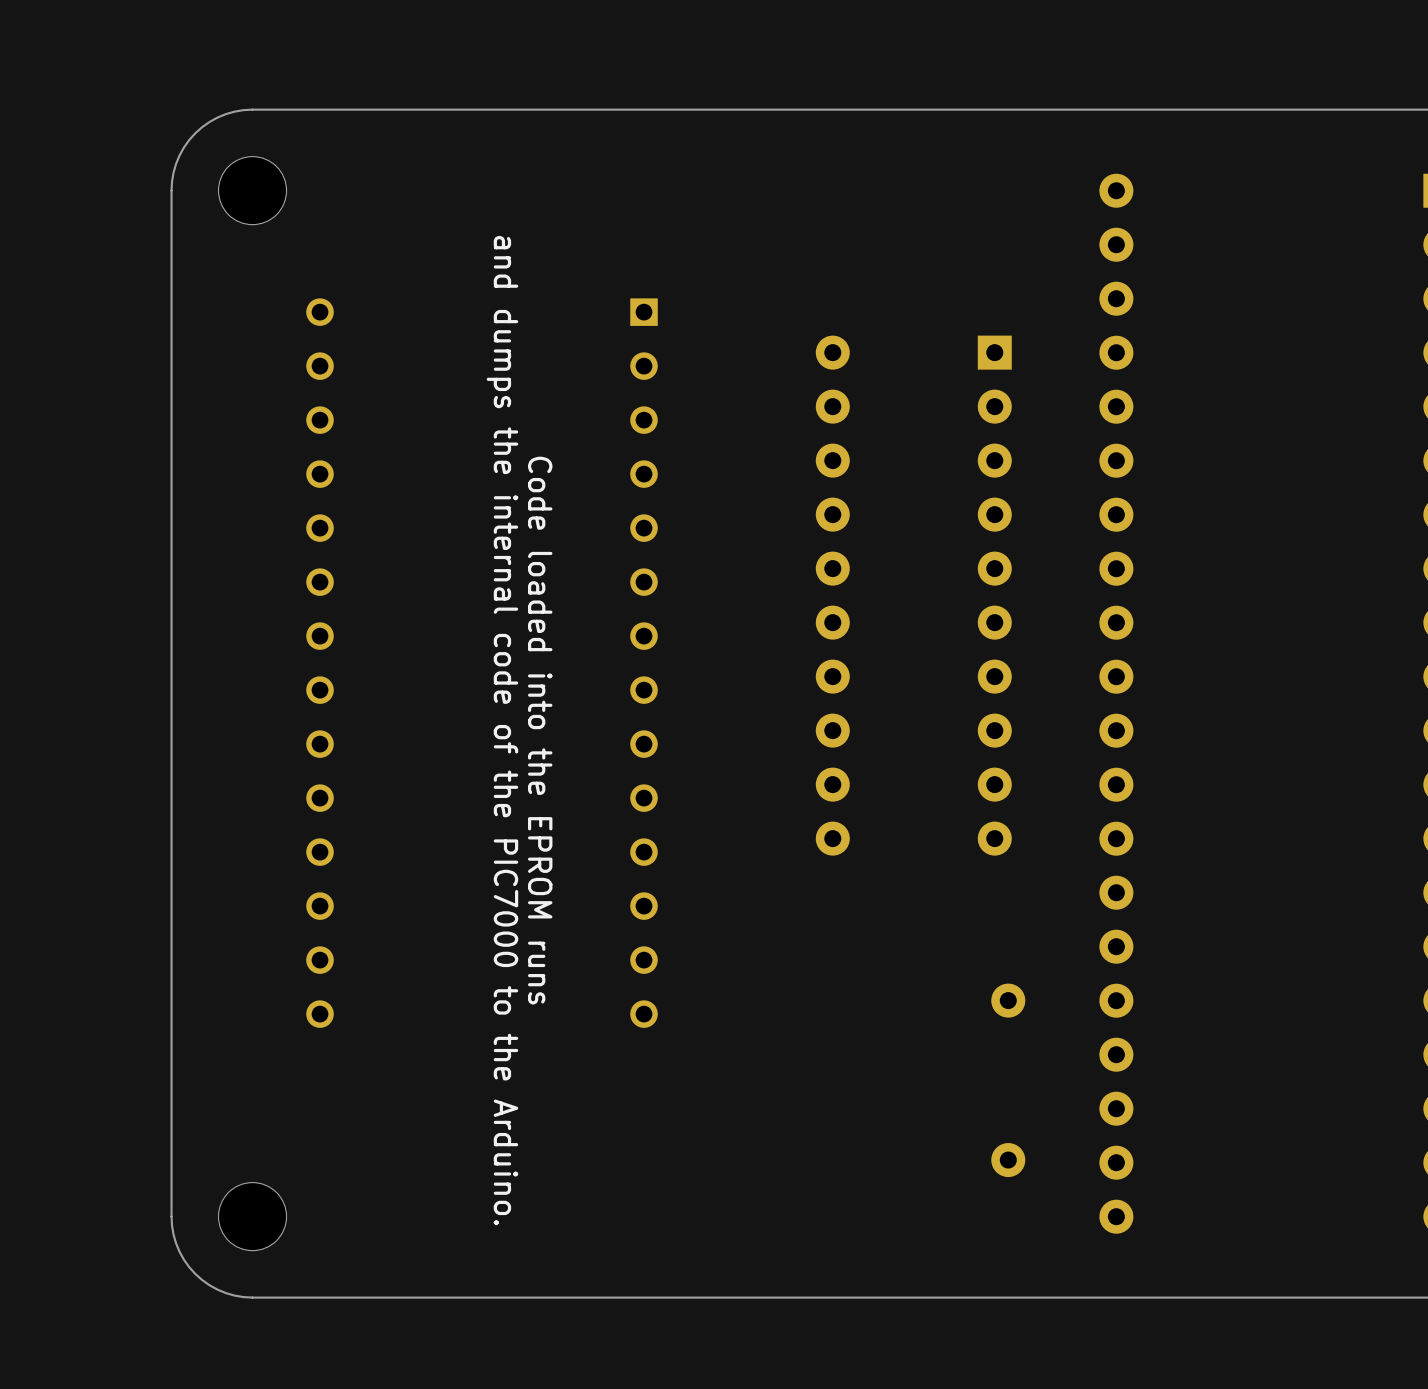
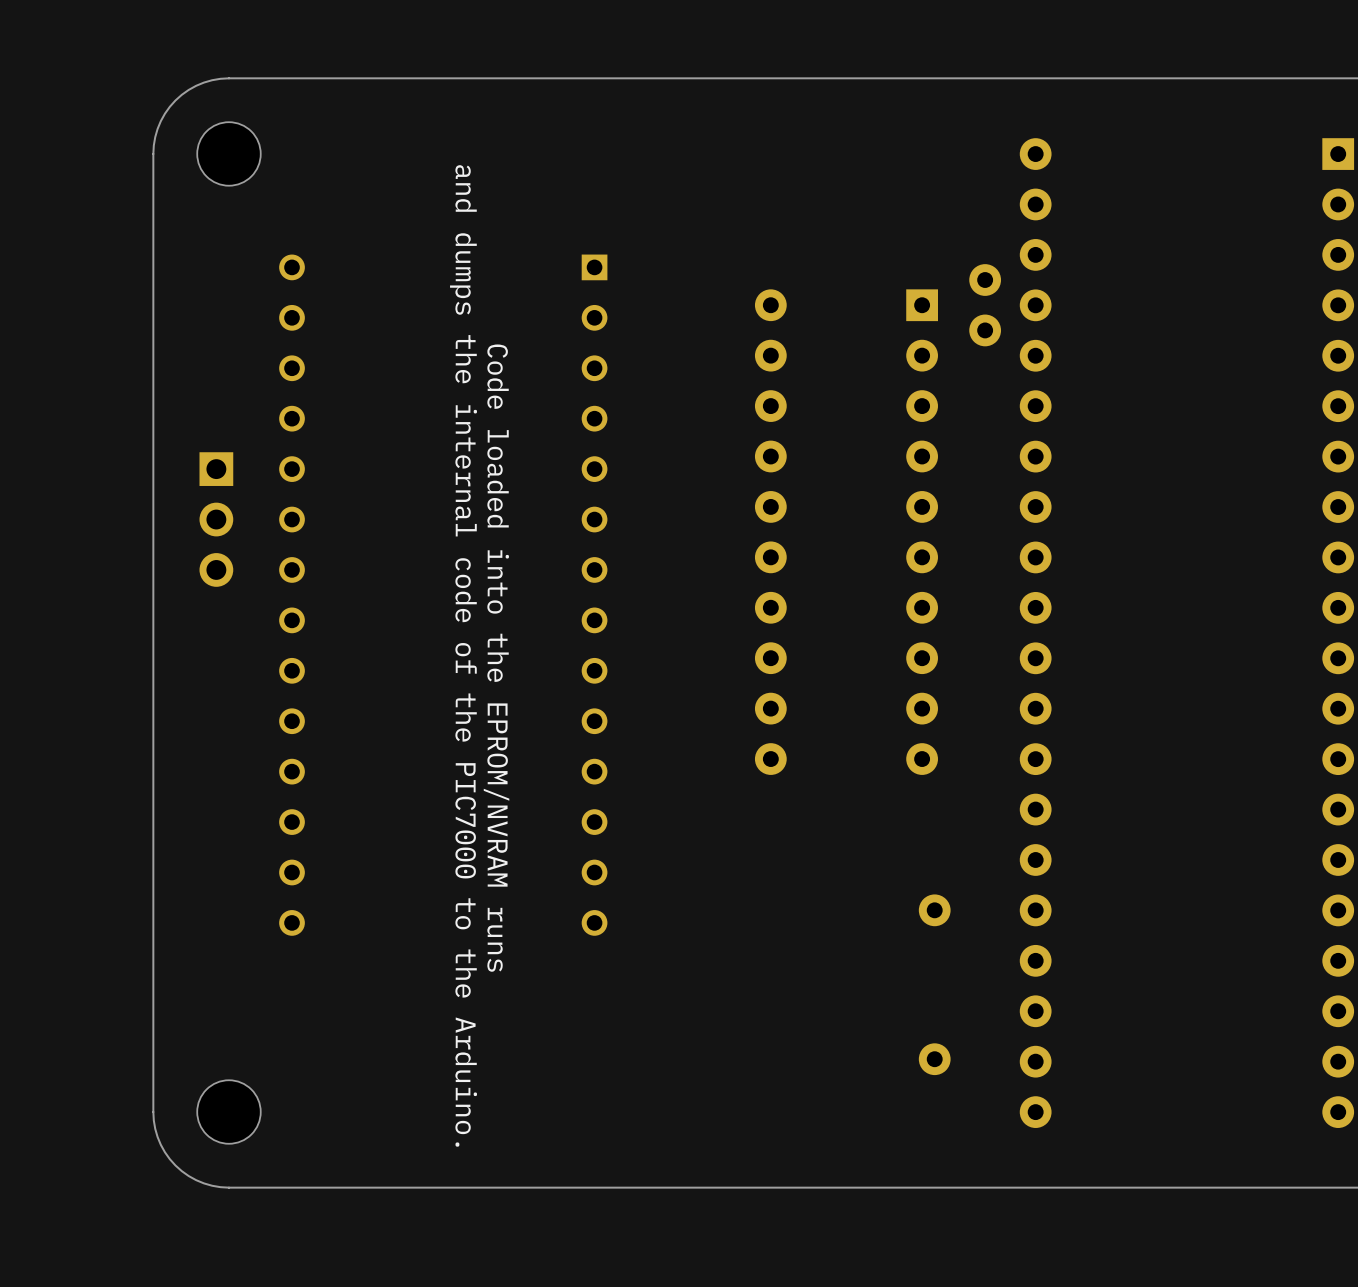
part: none -> (985, 305)
part: none -> (216, 519)
text: Code loaded into the EPROM runs (540, 730) -> Code loaded into the EPROM/NVRAM runs (496, 658)

